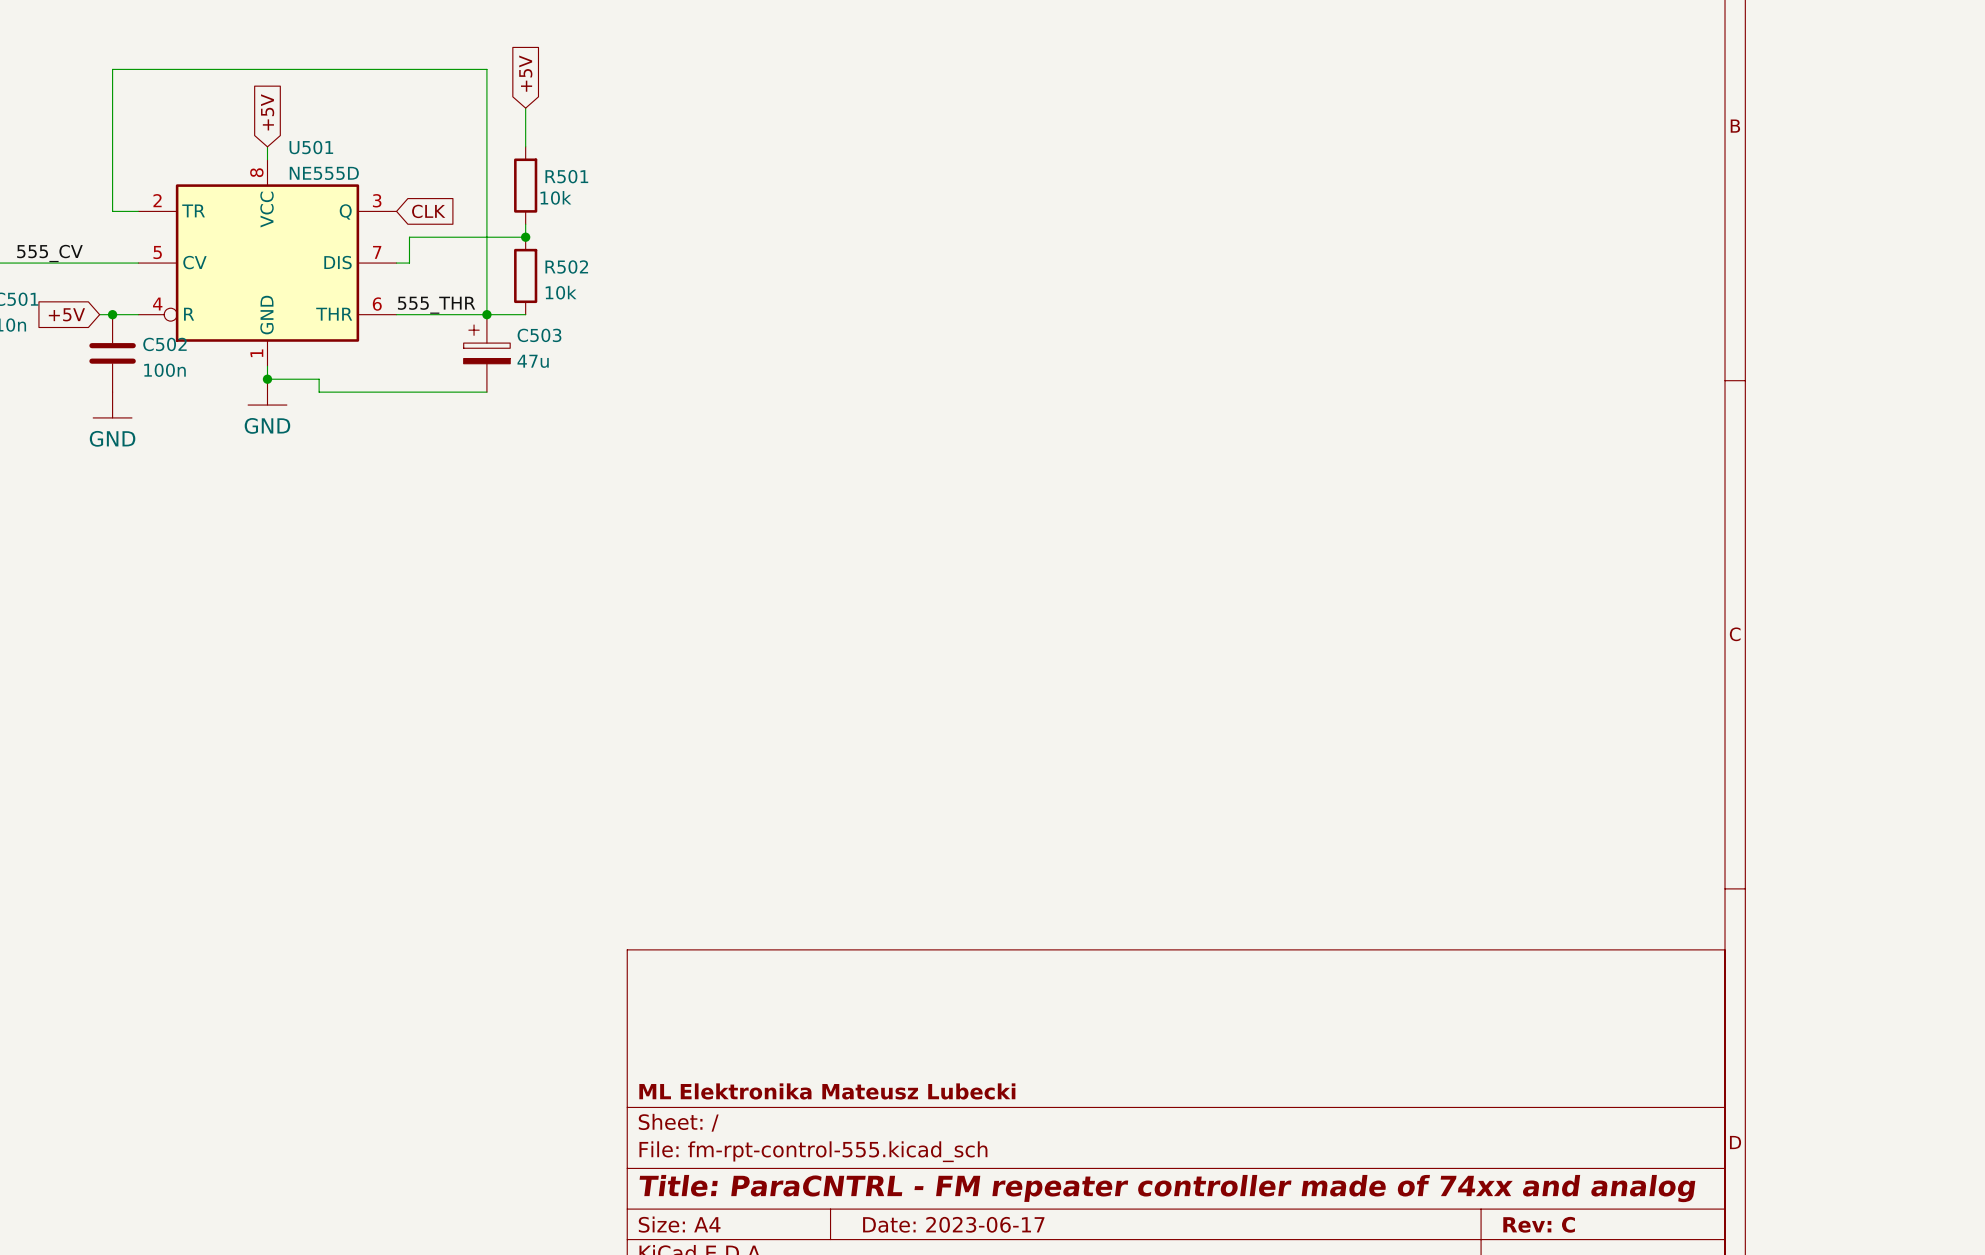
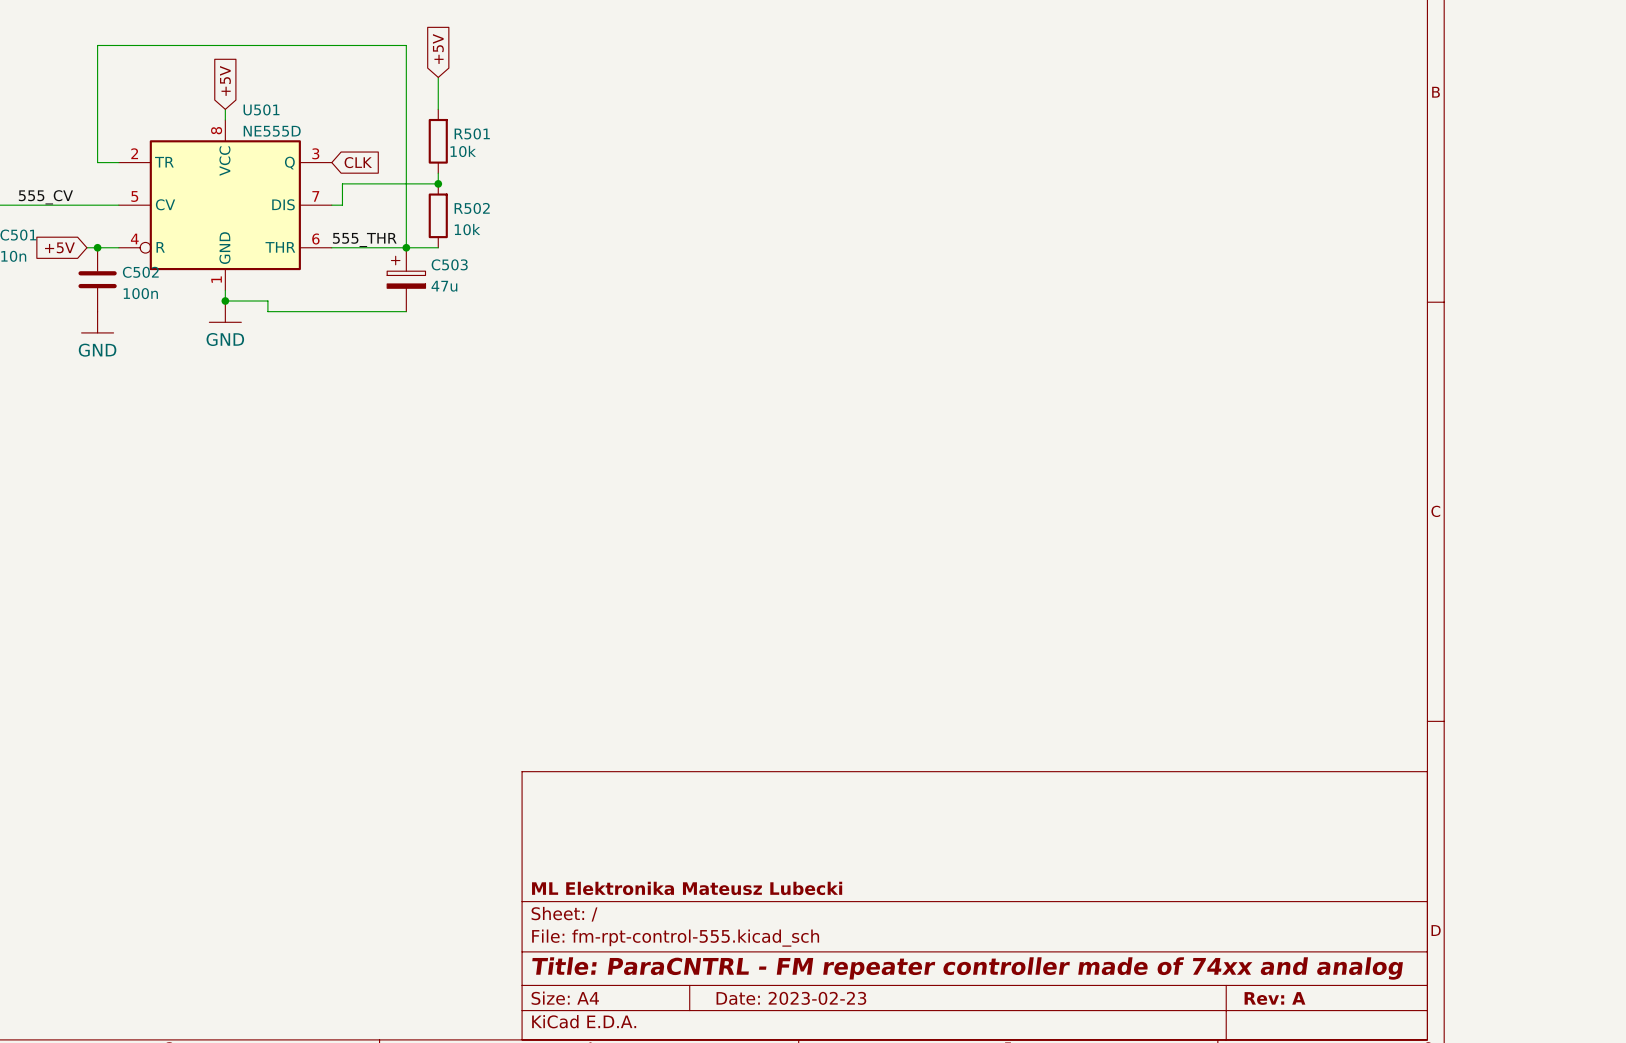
title block: Date: 2023-06-17 (953, 1224) -> Date: 2023-02-23 (791, 998)
title block: Rev: C (1539, 1224) -> Rev: A (1274, 998)

